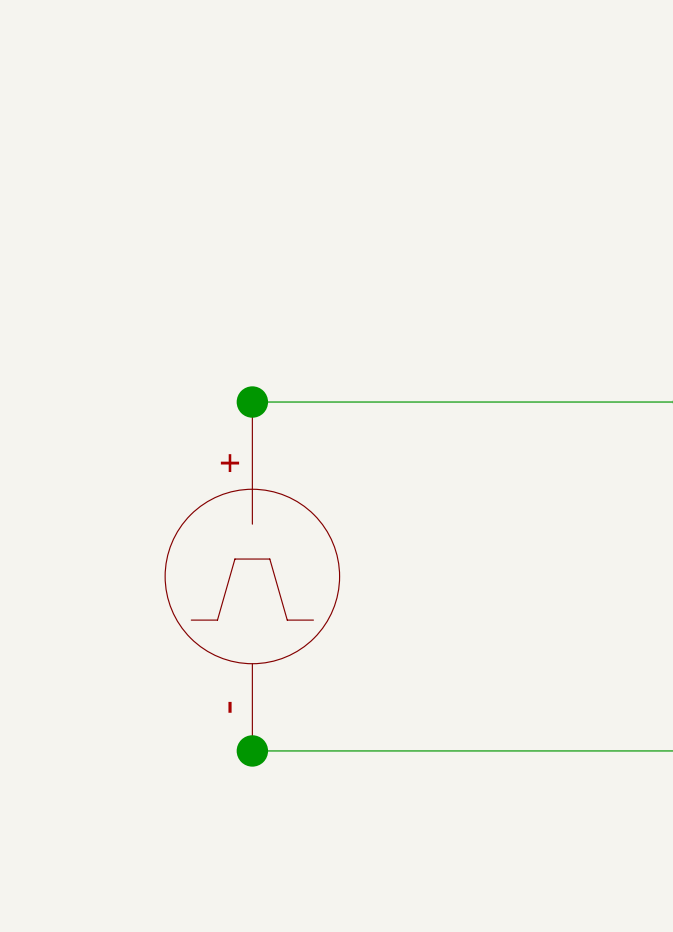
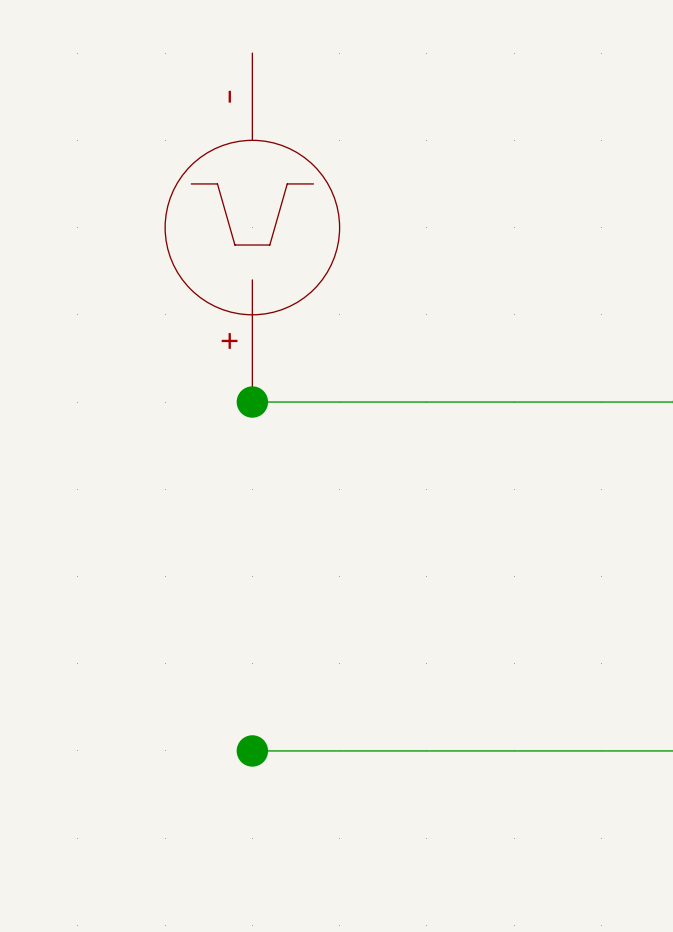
part rotation: 0° (252, 576) -> 180° (252, 227)
part position: (252, 576) -> (252, 227)

